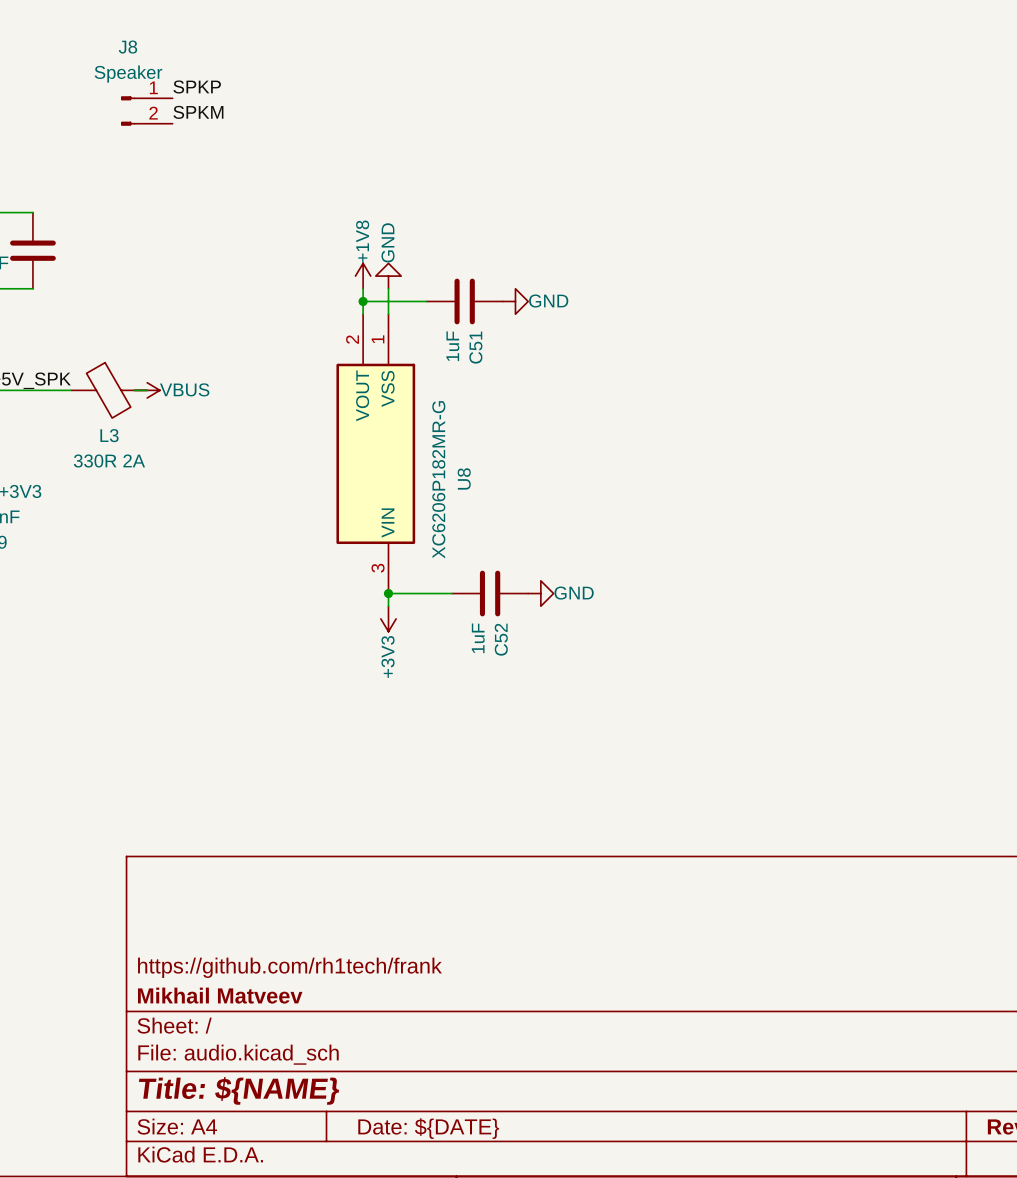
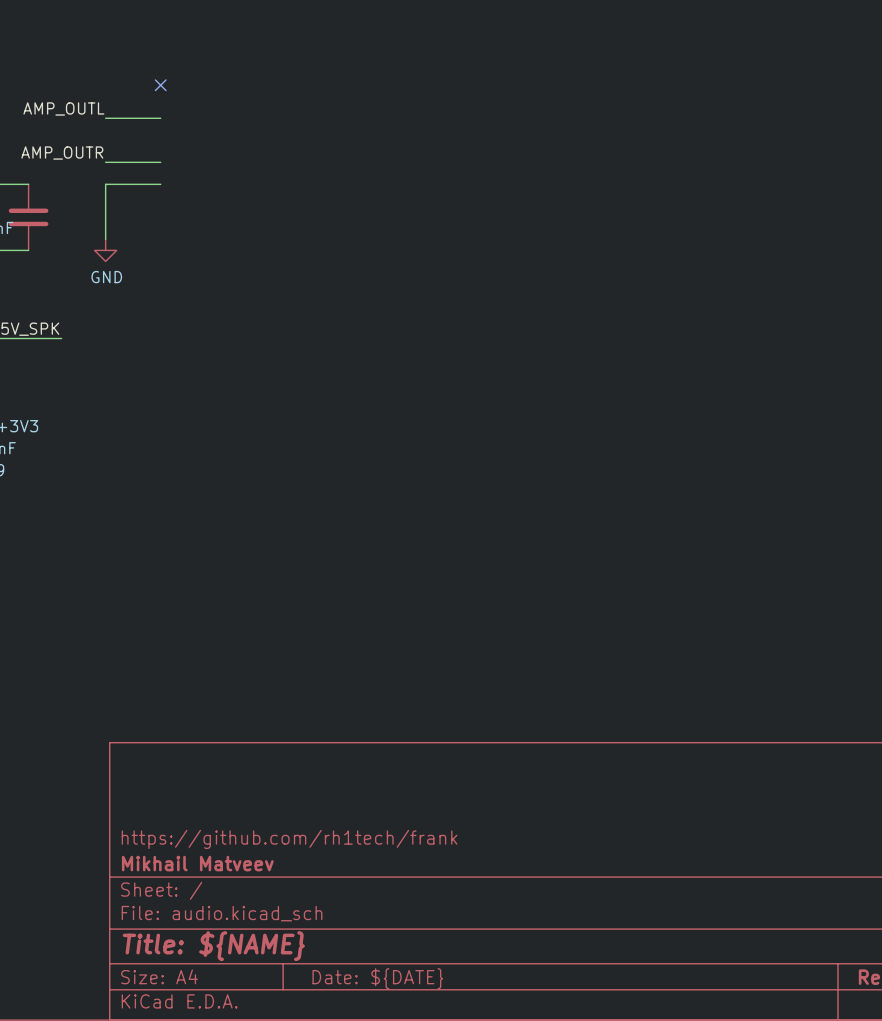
label: SPKP (197, 86) -> none
no-connect mark: none -> (160, 85)
J8: Speaker (146, 111) -> none
label: SPKM (198, 112) -> none
label: none -> AMP_OUTL (63, 108)
wire: none -> (105, 118) (160, 118)
label: none -> AMP_OUTR (62, 153)
wire: none -> (105, 162) (160, 162)
wire: none -> (160, 184) (105, 184) (105, 239)
power symbol: +1V8 (363, 276) -> none
power symbol: GND (388, 276) -> none
power symbol: none -> GND (105, 250)
wire: (363, 288) (363, 314) -> none
wire: (388, 288) (388, 314) -> none
wire: (363, 301) (426, 301) -> none
junction: (363, 301) -> none
C51: 1uF (464, 301) -> none
power symbol: GND (515, 301) -> none
L3: 330R 2A (109, 390) -> none
wire: (134, 390) (147, 390) -> none
power symbol: VBUS (147, 390) -> none
U8: XC6206P182MR-G (375, 453) -> none
junction: (388, 593) -> none
wire: (451, 593) (388, 593) (388, 606) -> none
C52: 1uF (490, 593) -> none
power symbol: GND (540, 593) -> none
power symbol: +3V3 (388, 618) -> none

